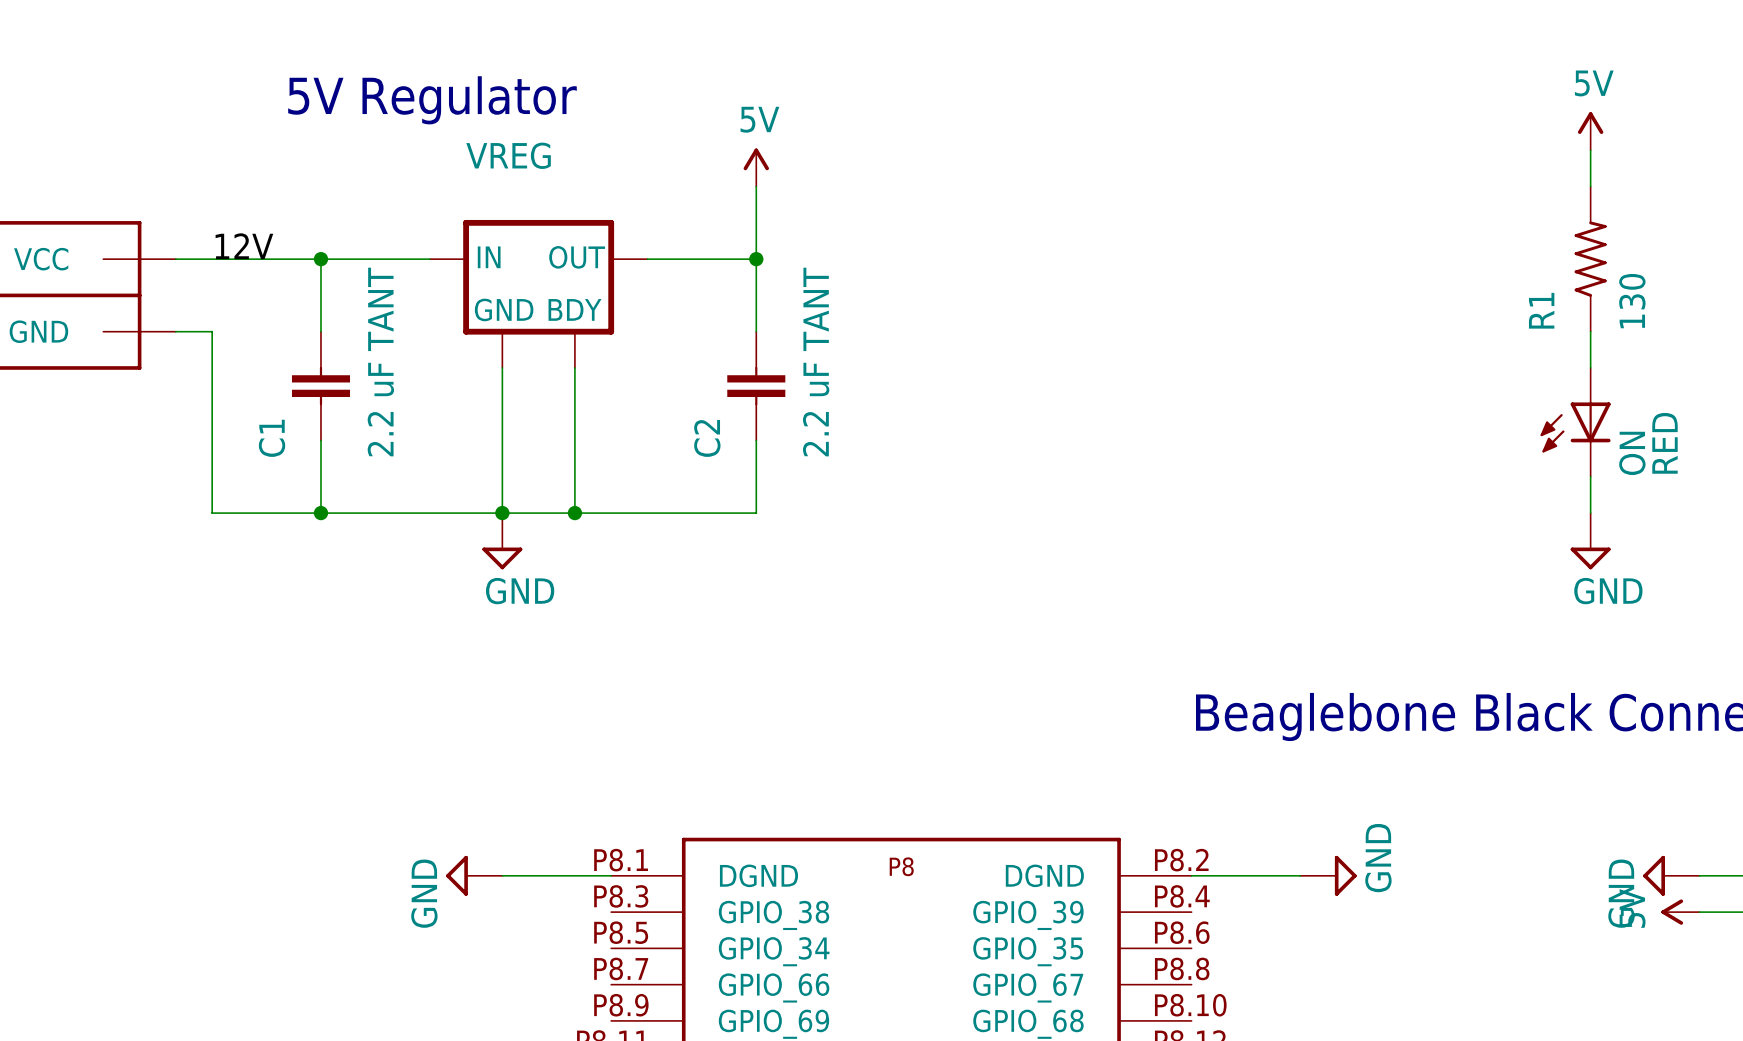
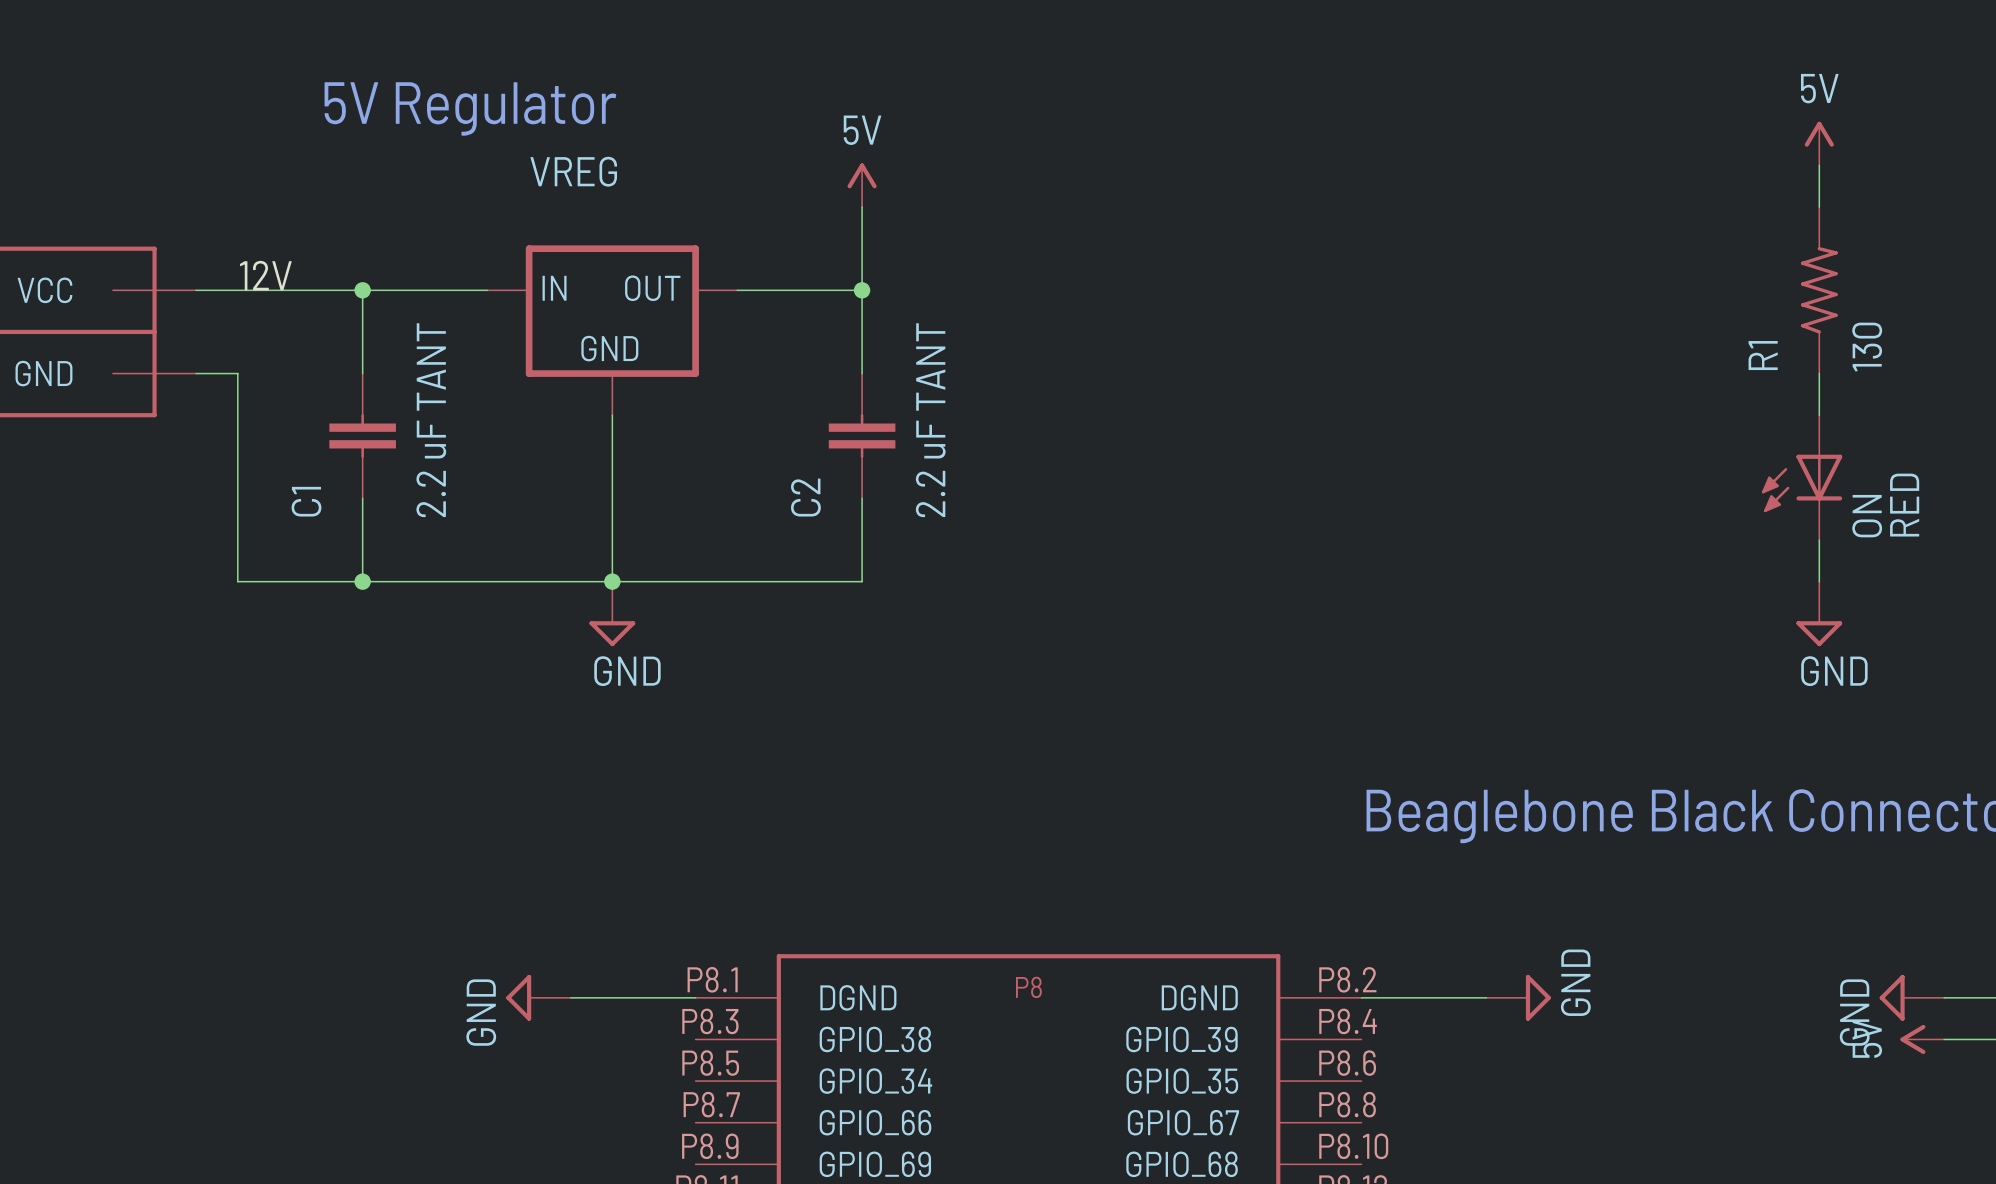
VREG symbol: [429, 219, 648, 368] -> [487, 245, 738, 416]
wire: (502, 367) (502, 513) -> (612, 415) (612, 581)
wire: (574, 367) (574, 513) -> none
junction: (502, 513) -> none
junction: none -> (612, 581)
junction: (574, 513) -> none
power symbol position: GND (502, 541) -> GND (612, 613)

